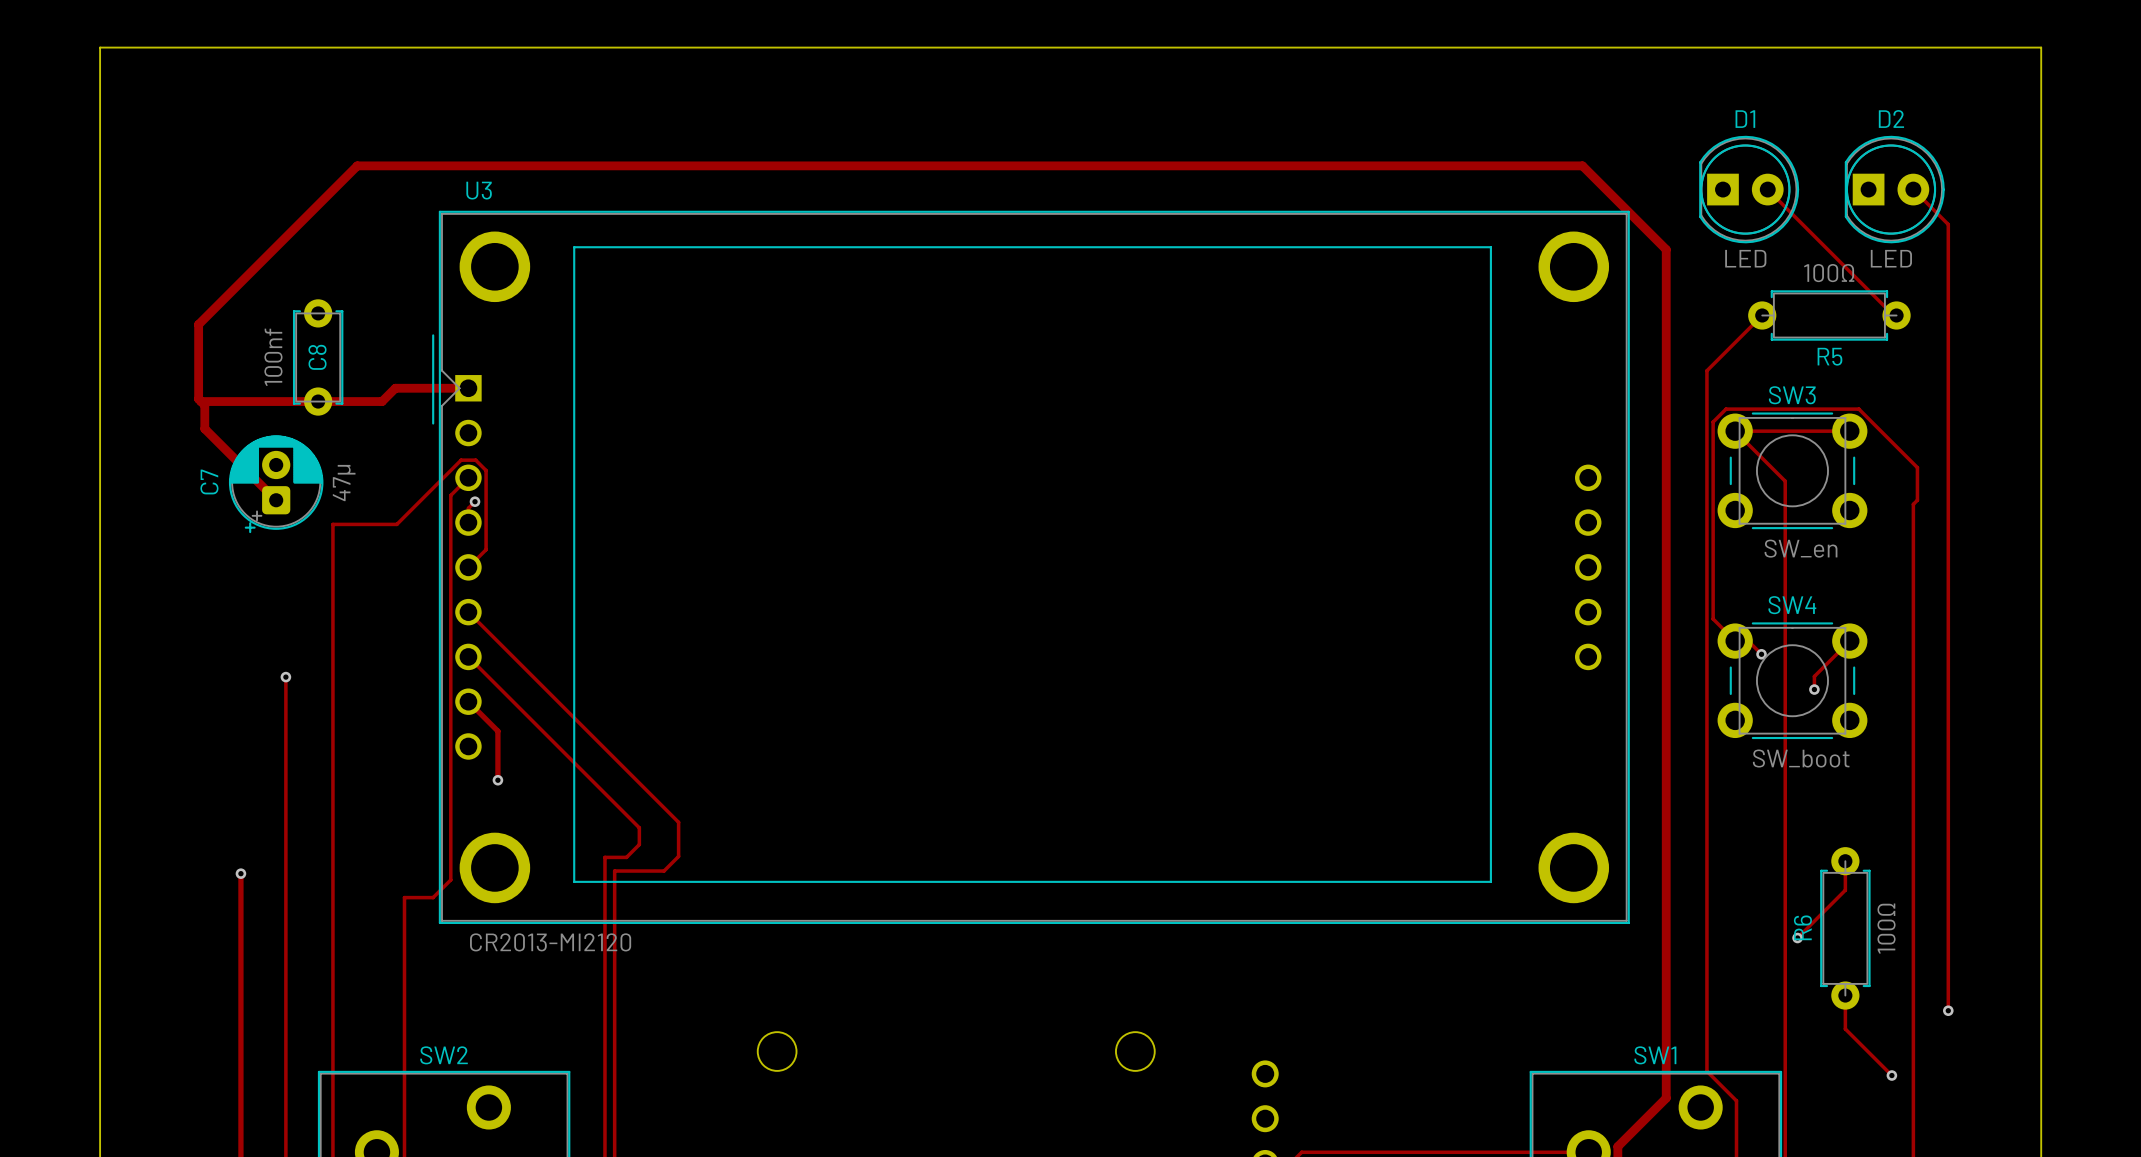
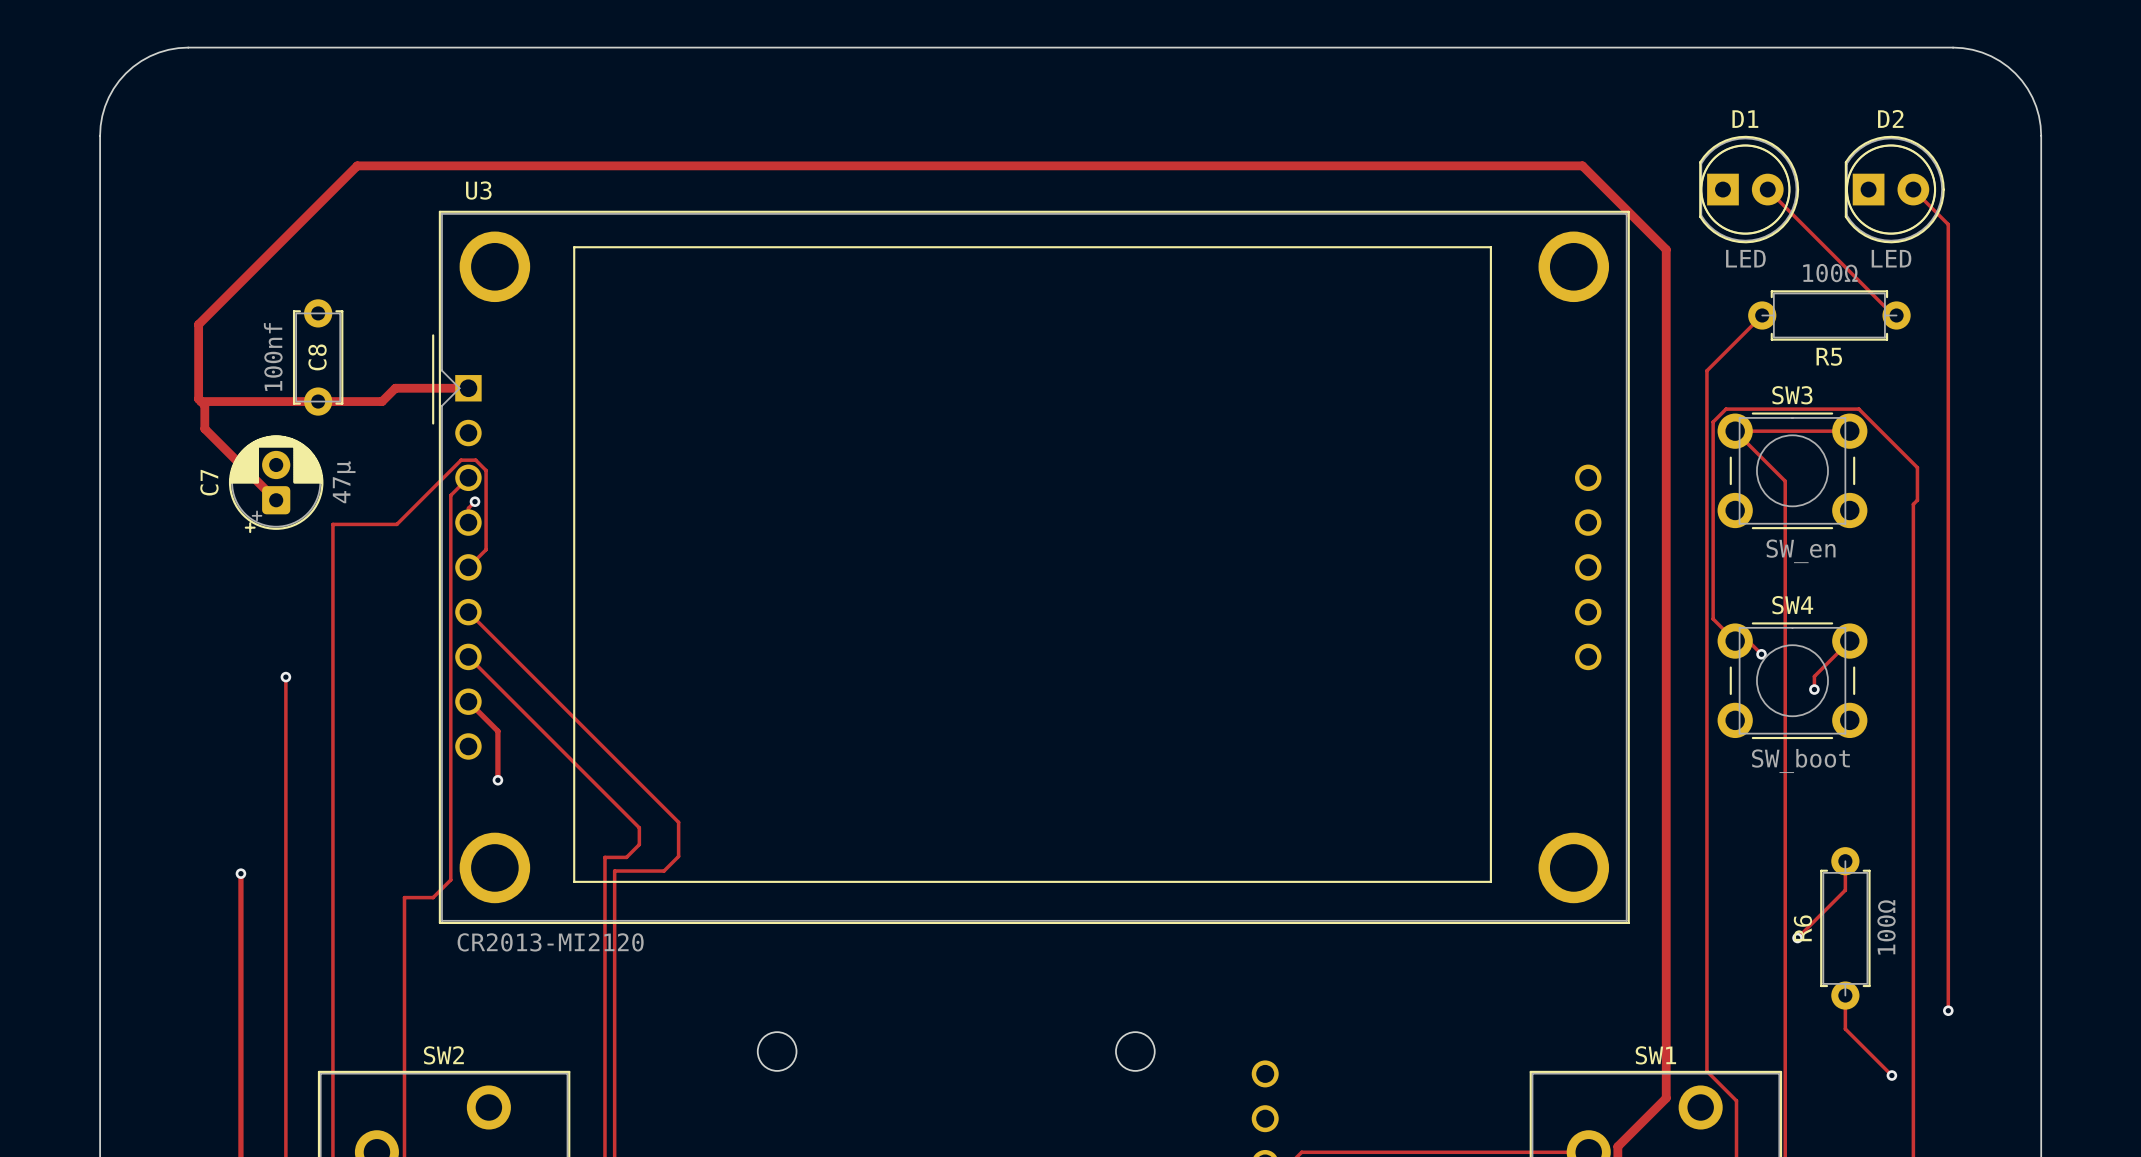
board edge: (188, 47) (100, 47) (100, 135) -> (188, 47) (159, 52) (141, 61) (125, 73) (108, 97) (102, 116) (100, 135)
board edge: (1953, 47) (2041, 47) (2041, 135) -> (1953, 47) (1982, 52) (1999, 61) (2015, 73) (2032, 97) (2038, 116) (2041, 135)

